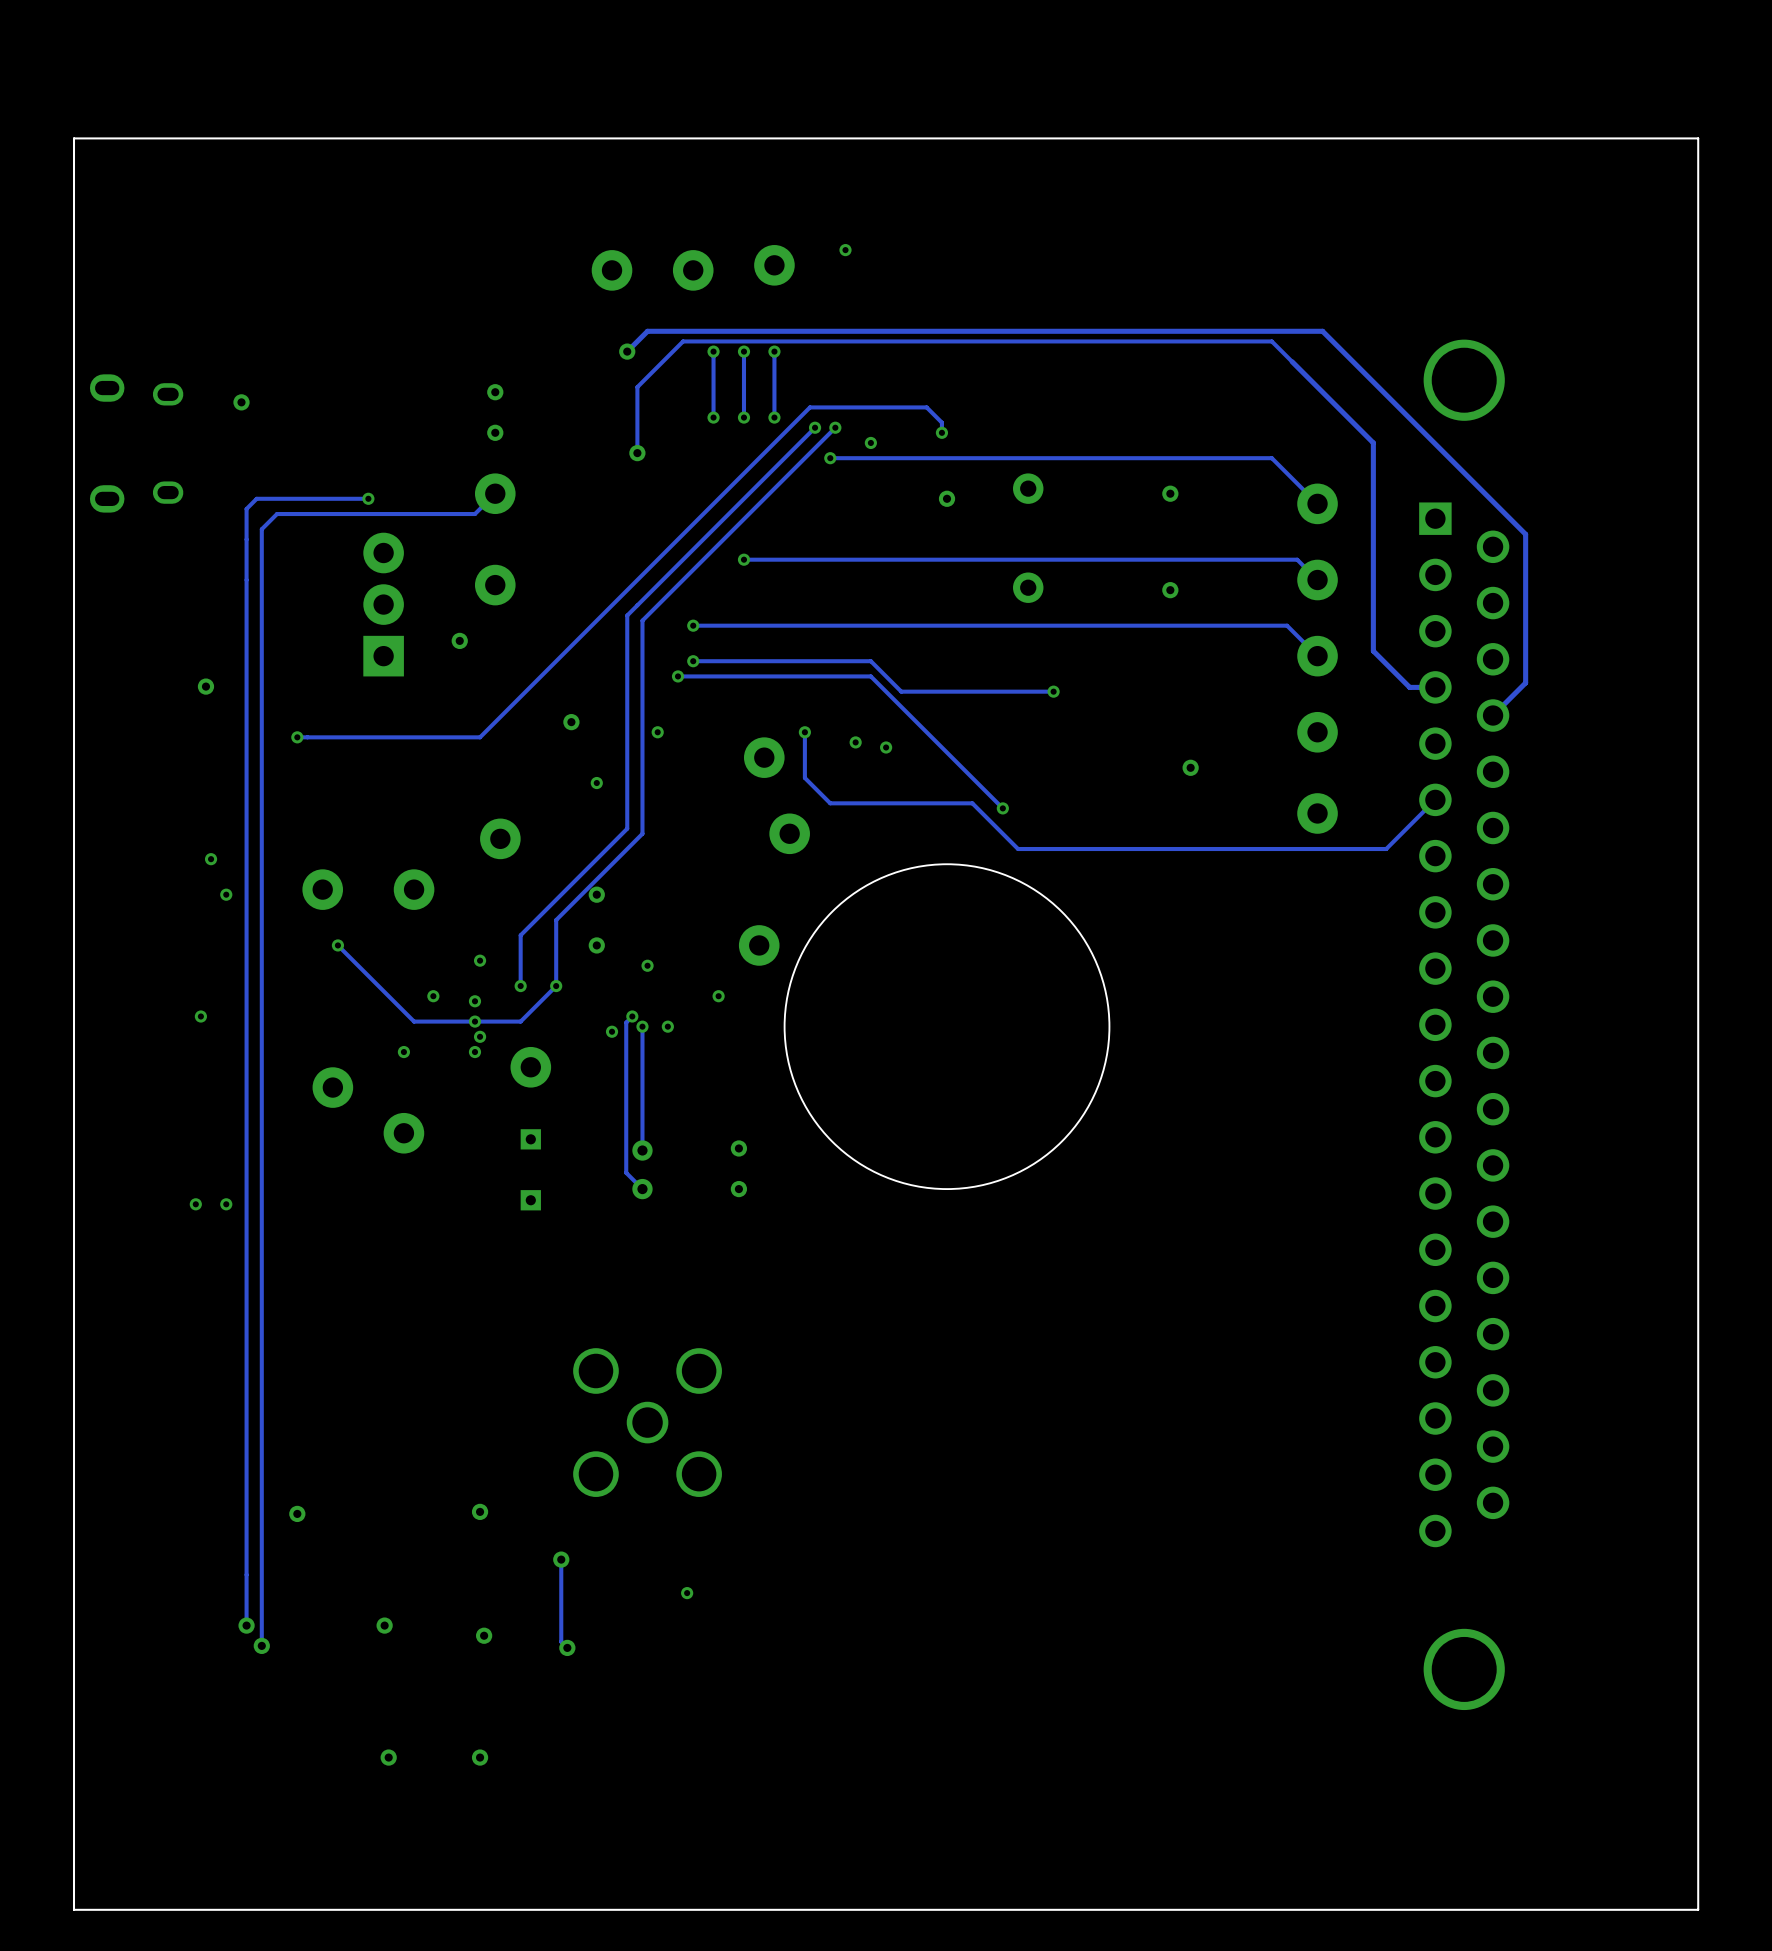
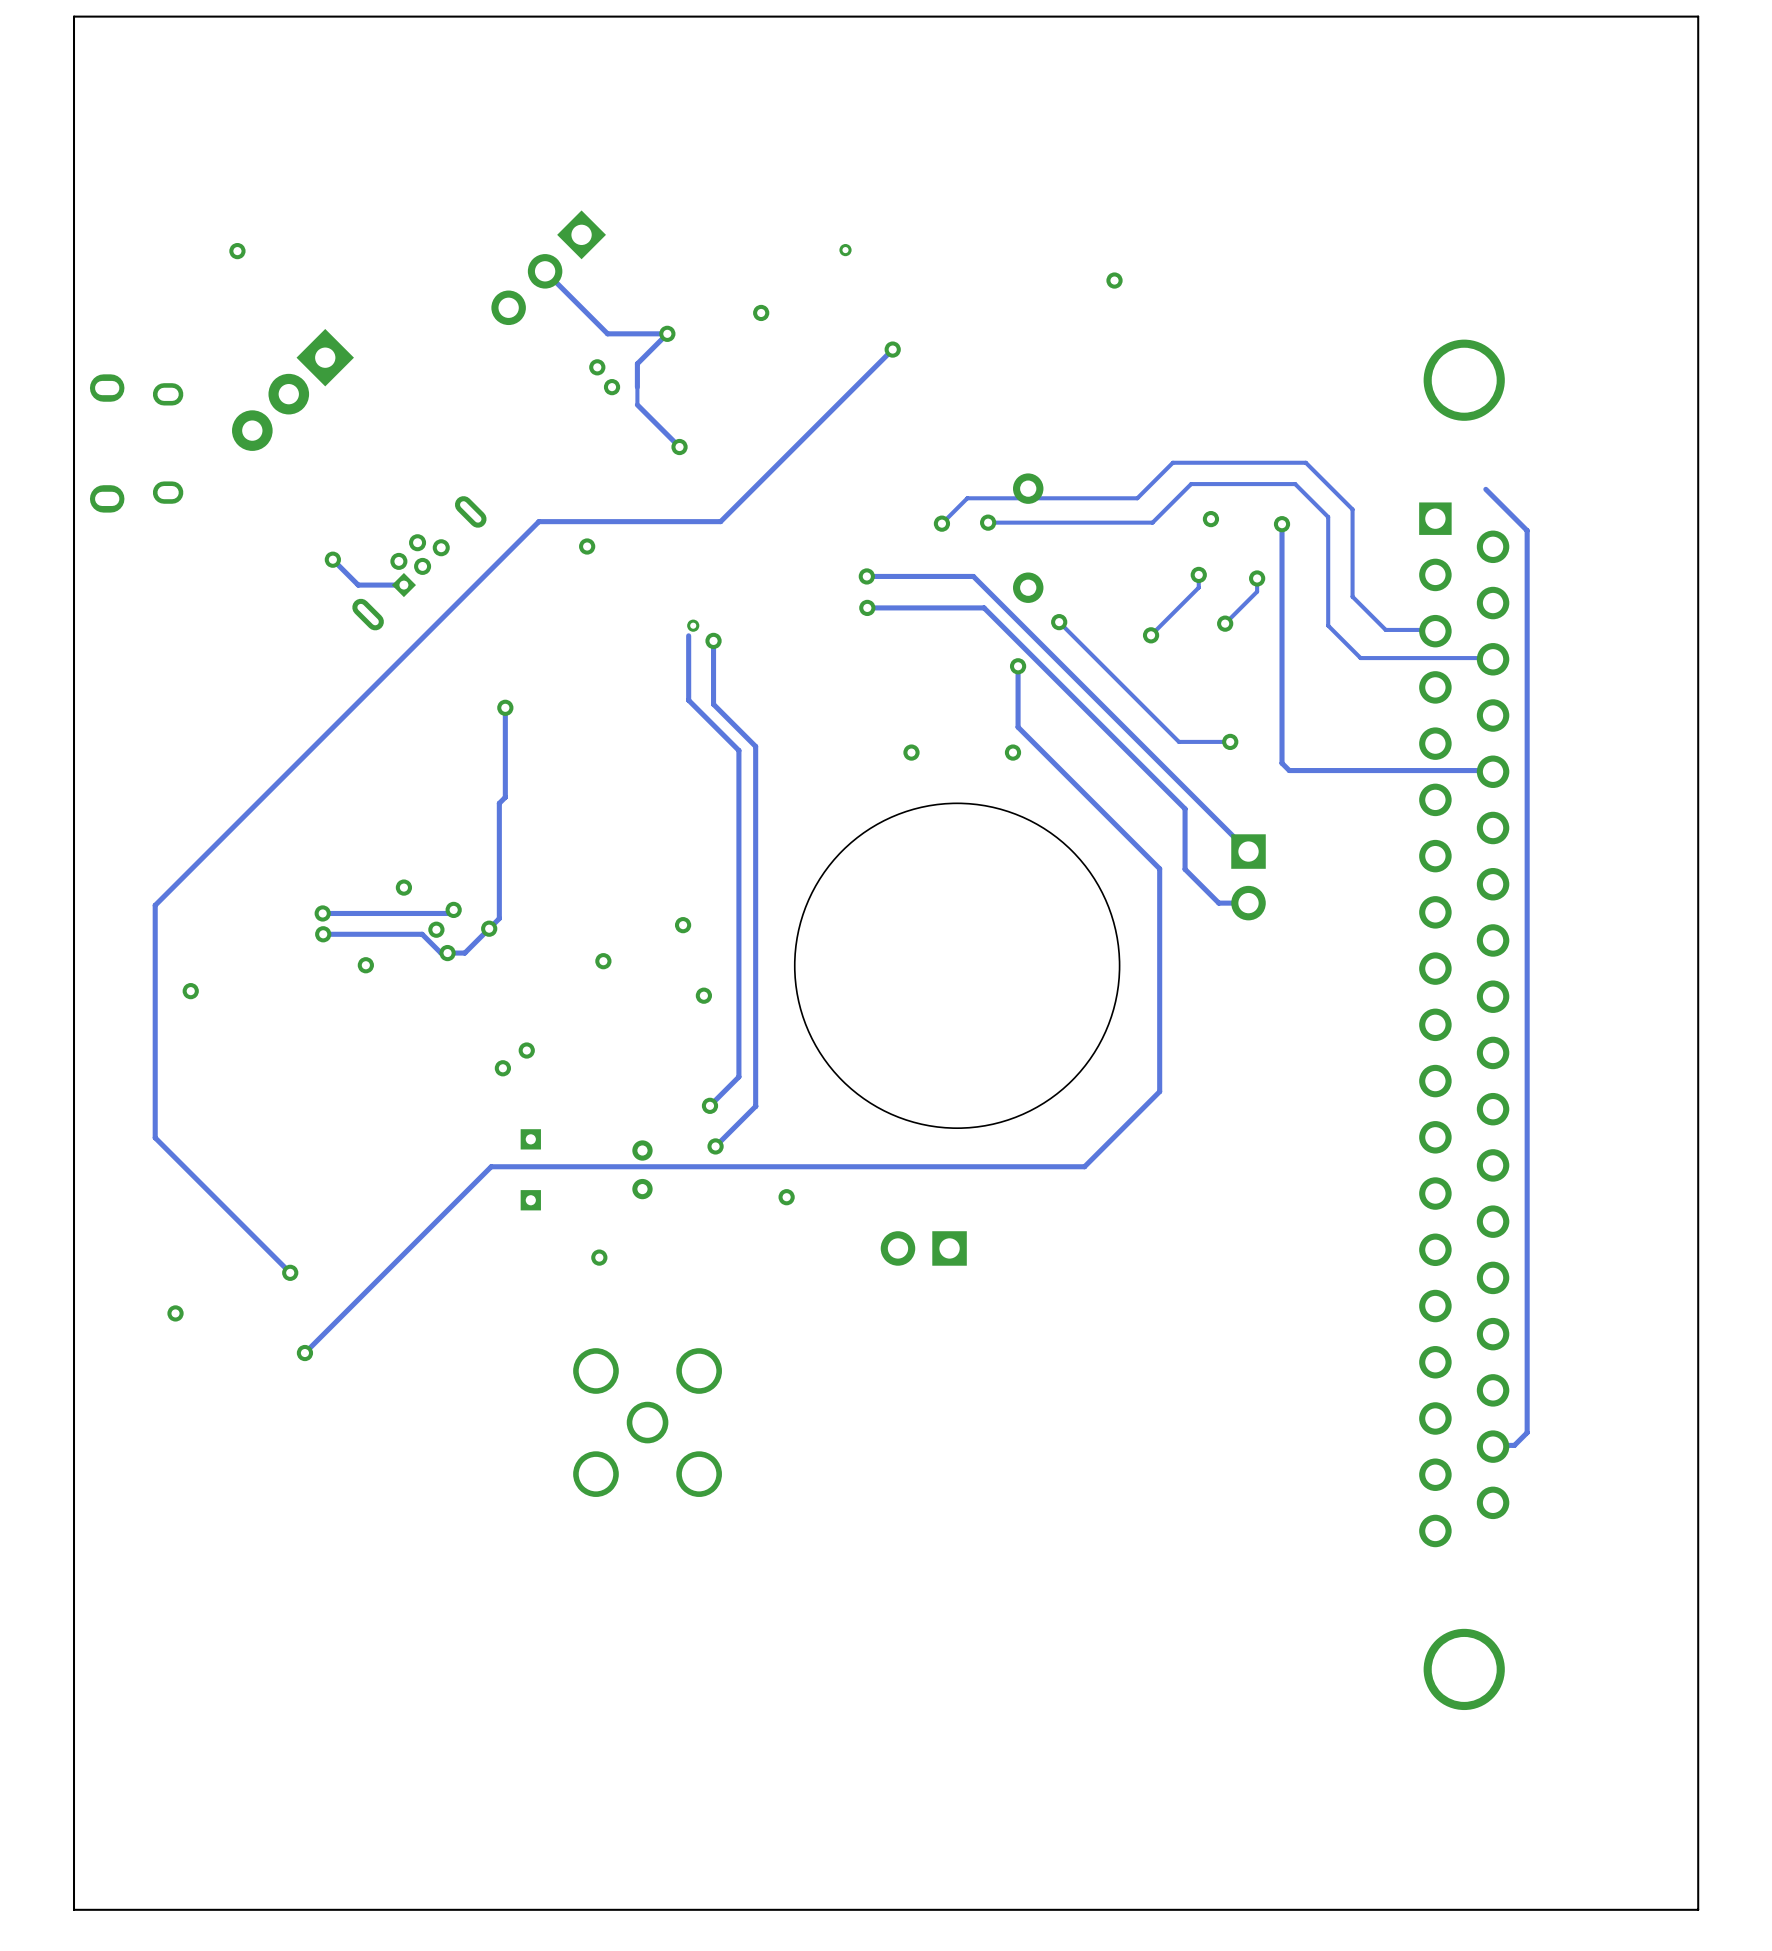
board edge: (1698, 138) (74, 138) -> (1698, 138) (1698, 16) (74, 16) (74, 138)
via: none -> (237, 251)
part: (774, 265) -> none
part: none -> (548, 267)
part: (612, 270) -> none
part: (693, 270) -> none
via: none -> (1114, 280)
via: none -> (761, 312)
via: none -> (667, 333)
track: none -> (892, 349) (720, 521) (538, 521) (155, 905) (155, 1137) (290, 1272)
via: none -> (892, 349)
track: (627, 351) (647, 331) (1322, 331) (1525, 534) (1525, 682) (1493, 715) -> none
via: (627, 351) -> none
track: (713, 351) (713, 417) -> none
via: (713, 351) -> none
track: (743, 351) (743, 417) -> none
via: (743, 351) -> none
track: (774, 351) (774, 417) -> none
via: (774, 351) -> none
via: none -> (597, 367)
via: none -> (612, 387)
track: (637, 387) (683, 341) (1271, 341) (1373, 442) (1373, 651) (1409, 687) (1435, 687) -> (637, 387) (637, 363) (667, 333) (607, 333) (545, 271)
part: none -> (292, 389)
via: (495, 392) -> none
via: (241, 402) -> none
track: (637, 404) (637, 453) -> (637, 404) (679, 447)
via: (713, 417) -> none
via: (743, 417) -> none
via: (774, 417) -> none
track: (815, 427) (627, 615) (627, 828) (520, 935) (520, 986) -> none
via: (815, 427) -> none
track: (835, 427) (642, 620) (642, 833) (556, 920) (556, 986) (520, 1021) (414, 1021) (337, 945) -> none
via: (835, 427) -> none
via: (495, 432) -> none
track: (941, 432) (941, 422) (926, 407) (809, 407) (480, 737) (297, 737) -> none
via: (941, 432) -> none
via: (870, 442) -> none
via: none -> (679, 447)
via: (637, 453) -> none
track: (830, 458) (1271, 458) (1317, 503) -> none
via: (830, 458) -> none
track: none -> (1485, 489) (1527, 530) (1527, 1432) (1514, 1445) (1485, 1445)
track: (495, 493) (474, 514) (277, 514) (261, 529) (261, 1645) -> none
part: (495, 493) -> none
via: (1170, 493) -> none
track: (368, 498) (256, 498) (246, 508) (246, 1625) -> none
via: (368, 498) -> none
via: (947, 498) -> none
part: (1317, 503) -> none
via: none -> (1210, 519)
track: none -> (988, 522) (1152, 522) (1191, 484) (1295, 484) (1328, 517) (1328, 625) (1360, 658) (1485, 658)
via: none -> (988, 522)
track: none -> (941, 523) (967, 498) (1137, 498) (1172, 462) (1305, 462) (1352, 509) (1352, 596) (1385, 629) (1434, 629)
via: none -> (941, 523)
track: none -> (1282, 524) (1282, 763) (1289, 770) (1485, 770)
via: none -> (1282, 524)
via: none -> (587, 546)
track: none -> (332, 559) (358, 585) (403, 585)
via: none -> (332, 559)
track: (743, 559) (1297, 559) (1317, 580) -> none
via: (743, 559) -> none
part: none -> (419, 563)
track: none -> (1198, 574) (1198, 587) (1151, 635)
via: none -> (1198, 574)
track: none -> (866, 576) (973, 576) (1248, 851)
via: none -> (866, 576)
track: none -> (1257, 578) (1257, 591) (1225, 623)
via: none -> (1257, 578)
part: (1317, 580) -> none
part: (495, 585) -> none
via: (1170, 590) -> none
part: (383, 604) -> none
track: none -> (867, 607) (984, 607) (1185, 808) (1185, 869) (1218, 903) (1248, 903)
via: none -> (867, 607)
track: none -> (1059, 622) (1178, 741) (1230, 741)
via: none -> (1059, 622)
via: none -> (1225, 623)
track: (693, 625) (1287, 625) (1317, 656) -> none
track: none -> (688, 635) (688, 700) (738, 750) (738, 1076) (709, 1105)
via: none -> (1151, 635)
via: (459, 640) -> none
via: none -> (713, 640)
track: none -> (715, 642) (713, 640) (713, 704) (755, 746) (755, 1106) (715, 1146)
part: (1317, 656) -> none
track: (693, 661) (870, 661) (901, 691) (1053, 691) -> none
via: (693, 661) -> none
track: none -> (1018, 666) (1018, 727) (1159, 868) (1159, 1091) (1084, 1166) (491, 1166) (304, 1353)
via: none -> (1018, 666)
track: (678, 676) (870, 676) (1002, 808) -> none
via: (678, 676) -> none
via: (205, 686) -> none
via: (1053, 691) -> none
track: none -> (505, 707) (505, 797) (499, 803) (499, 918) (464, 953) (440, 953) (422, 934) (323, 934)
via: none -> (505, 707)
via: (571, 722) -> none
via: (657, 732) -> none
track: (804, 732) (804, 777) (830, 803) (972, 803) (1018, 849) (1386, 849) (1435, 799) -> none
via: (804, 732) -> none
part: (1317, 732) -> none
via: (297, 737) -> none
via: (855, 742) -> none
via: (886, 747) -> none
via: none -> (911, 752)
via: none -> (1013, 752)
part: (764, 757) -> none
via position: (1190, 767) -> (1230, 741)
via: (596, 783) -> none
via: (1002, 808) -> none
part: (1317, 813) -> none
part: (789, 833) -> none
part: (500, 838) -> none
via: (211, 859) -> none
part: none -> (1248, 877)
via: none -> (403, 887)
part: (322, 889) -> none
part: (414, 889) -> none
via: (226, 894) -> none
via: (596, 894) -> none
track: none -> (453, 909) (450, 913) (322, 913)
via: none -> (453, 909)
via: none -> (322, 913)
via: none -> (683, 925)
via: none -> (489, 928)
via: none -> (436, 929)
via: none -> (323, 934)
via: (337, 945) -> none
via position: (596, 945) -> (603, 961)
part: (759, 945) -> none
via: none -> (447, 953)
via: (480, 960) -> none
via: none -> (365, 965)
via: (647, 965) -> none
via: (520, 986) -> none
via: (556, 986) -> none
via: none -> (190, 991)
via: none -> (703, 995)
via: (433, 996) -> none
via: (718, 996) -> none
via: (474, 1001) -> none
via: (200, 1016) -> none
track: (632, 1016) (626, 1022) (626, 1172) (642, 1189) -> none
via: (632, 1016) -> none
via: (474, 1021) -> none
track: (642, 1026) (642, 1150) -> none
via: (642, 1026) -> none
via: (667, 1026) -> none
round board edge position: (947, 1026) -> (957, 965)
via: (612, 1031) -> none
via: (480, 1036) -> none
via: none -> (526, 1050)
via: (403, 1052) -> none
via: (474, 1052) -> none
part: (530, 1067) -> none
via: none -> (502, 1068)
part: (332, 1087) -> none
via: none -> (709, 1105)
part: (403, 1133) -> none
via position: (738, 1148) -> (715, 1146)
via: (738, 1189) -> none
via: none -> (786, 1197)
via: (195, 1204) -> none
via: (226, 1204) -> none
part: none -> (923, 1248)
via: none -> (599, 1257)
via: none -> (290, 1272)
via: none -> (175, 1313)
via: none -> (304, 1353)
via: (480, 1511) -> none
via: (297, 1513) -> none
track: (561, 1559) (561, 1641) (567, 1647) -> none
via: (561, 1559) -> none
via: (687, 1593) -> none
via: (246, 1625) -> none
via: (384, 1625) -> none
via: (484, 1635) -> none
via: (261, 1645) -> none
via: (567, 1647) -> none
via: (388, 1757) -> none
via: (480, 1757) -> none

